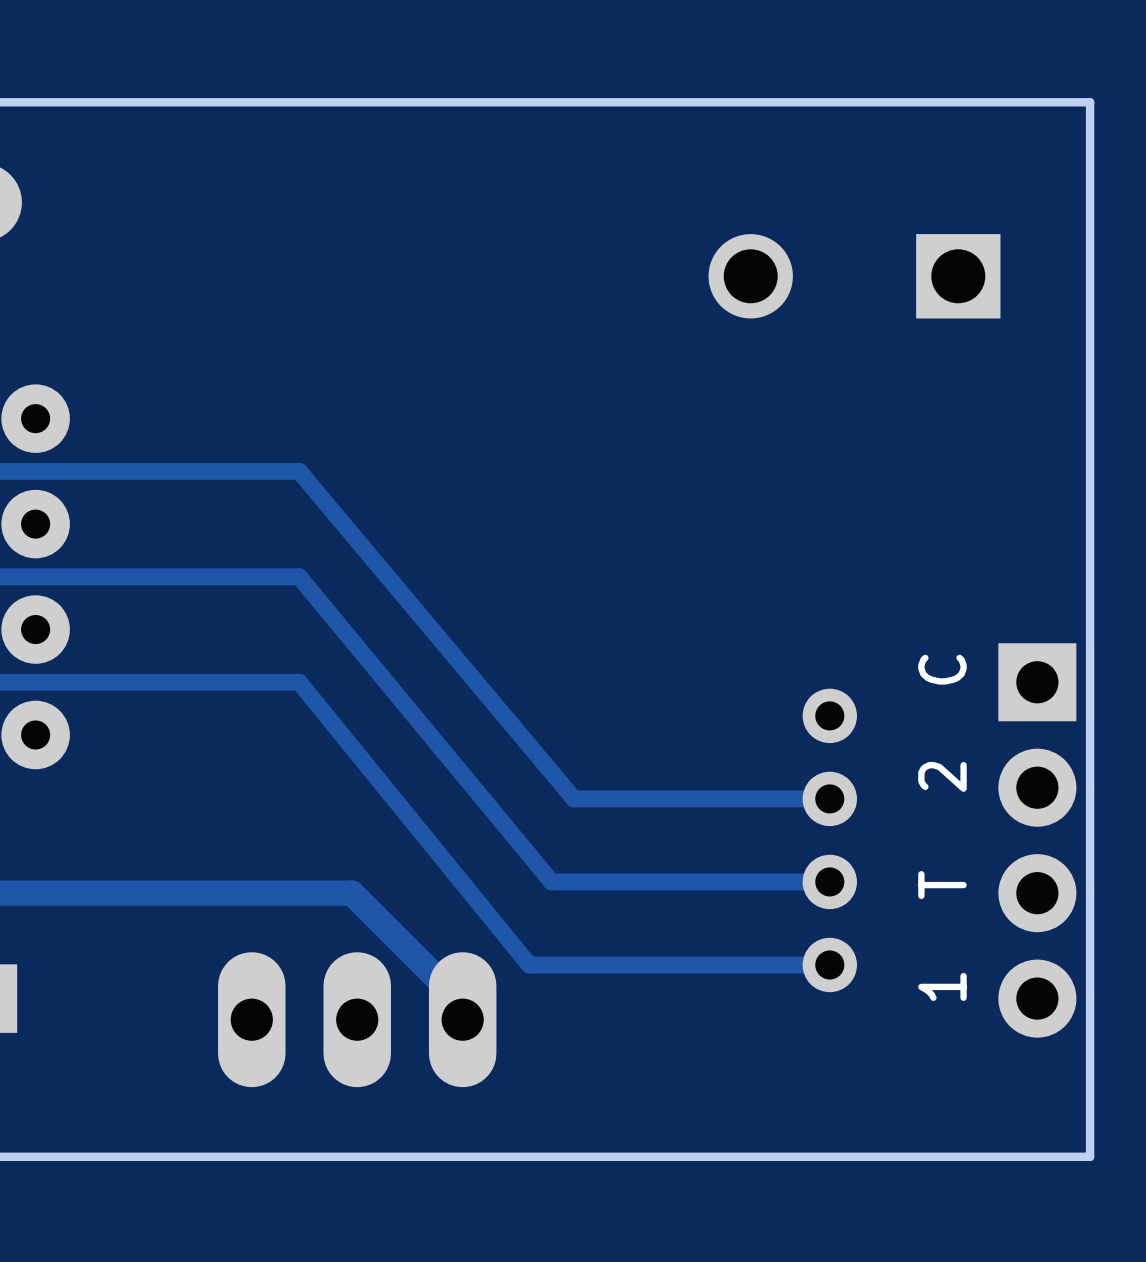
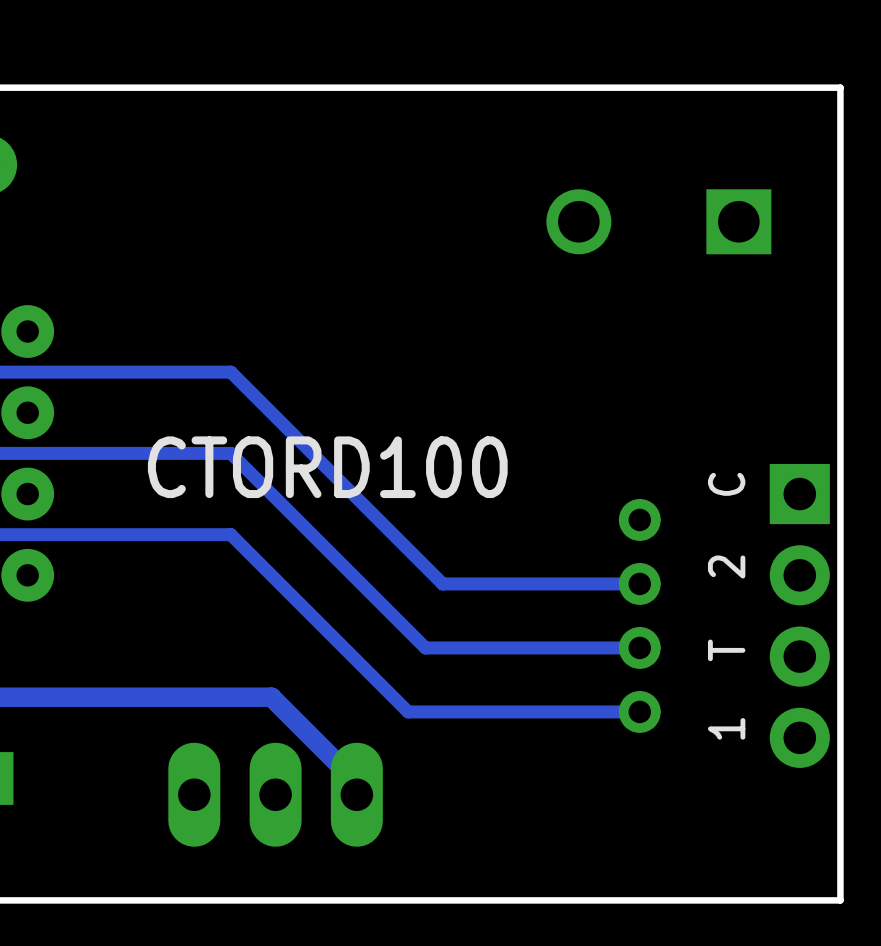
track: (299, 471) (574, 798) (829, 798) -> (230, 372) (442, 583) (639, 583)
track: (299, 576) (551, 881) (829, 881) -> (230, 453) (425, 647) (639, 647)
text: none -> CTORD100 (327, 467)
text position: C (942, 669) -> C (726, 484)
track: (299, 682) (529, 964) (829, 964) -> (230, 534) (408, 711) (639, 711)
text position: 2 (942, 776) -> 2 (726, 567)
part position: (829, 840) -> (639, 615)
part position: (1037, 840) -> (799, 615)
text position: T (942, 885) -> T (726, 650)
text position: 1 (942, 986) -> 1 (726, 728)

